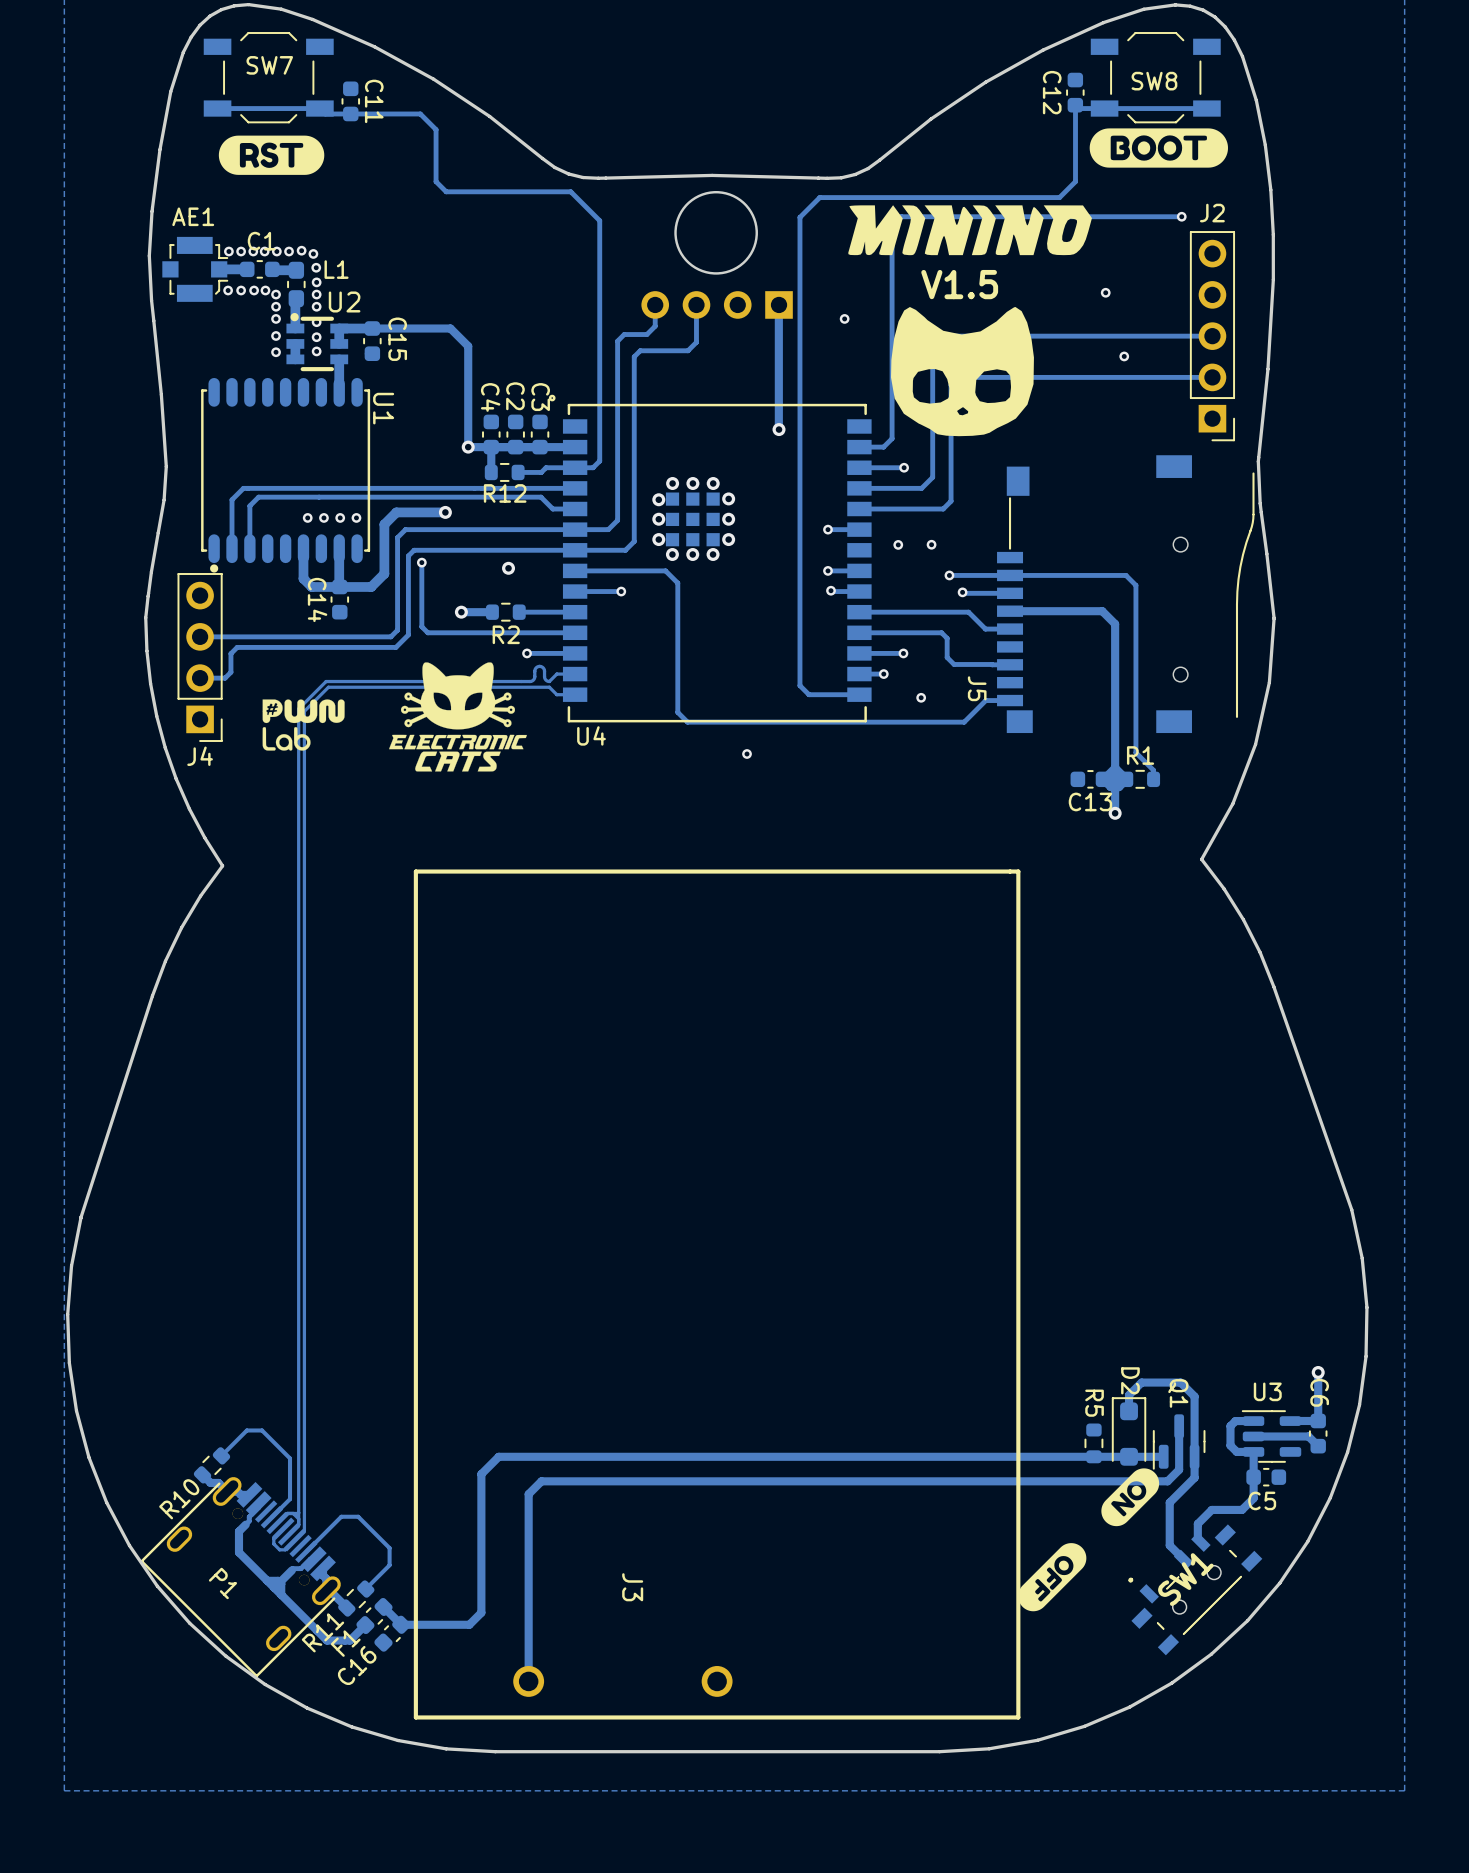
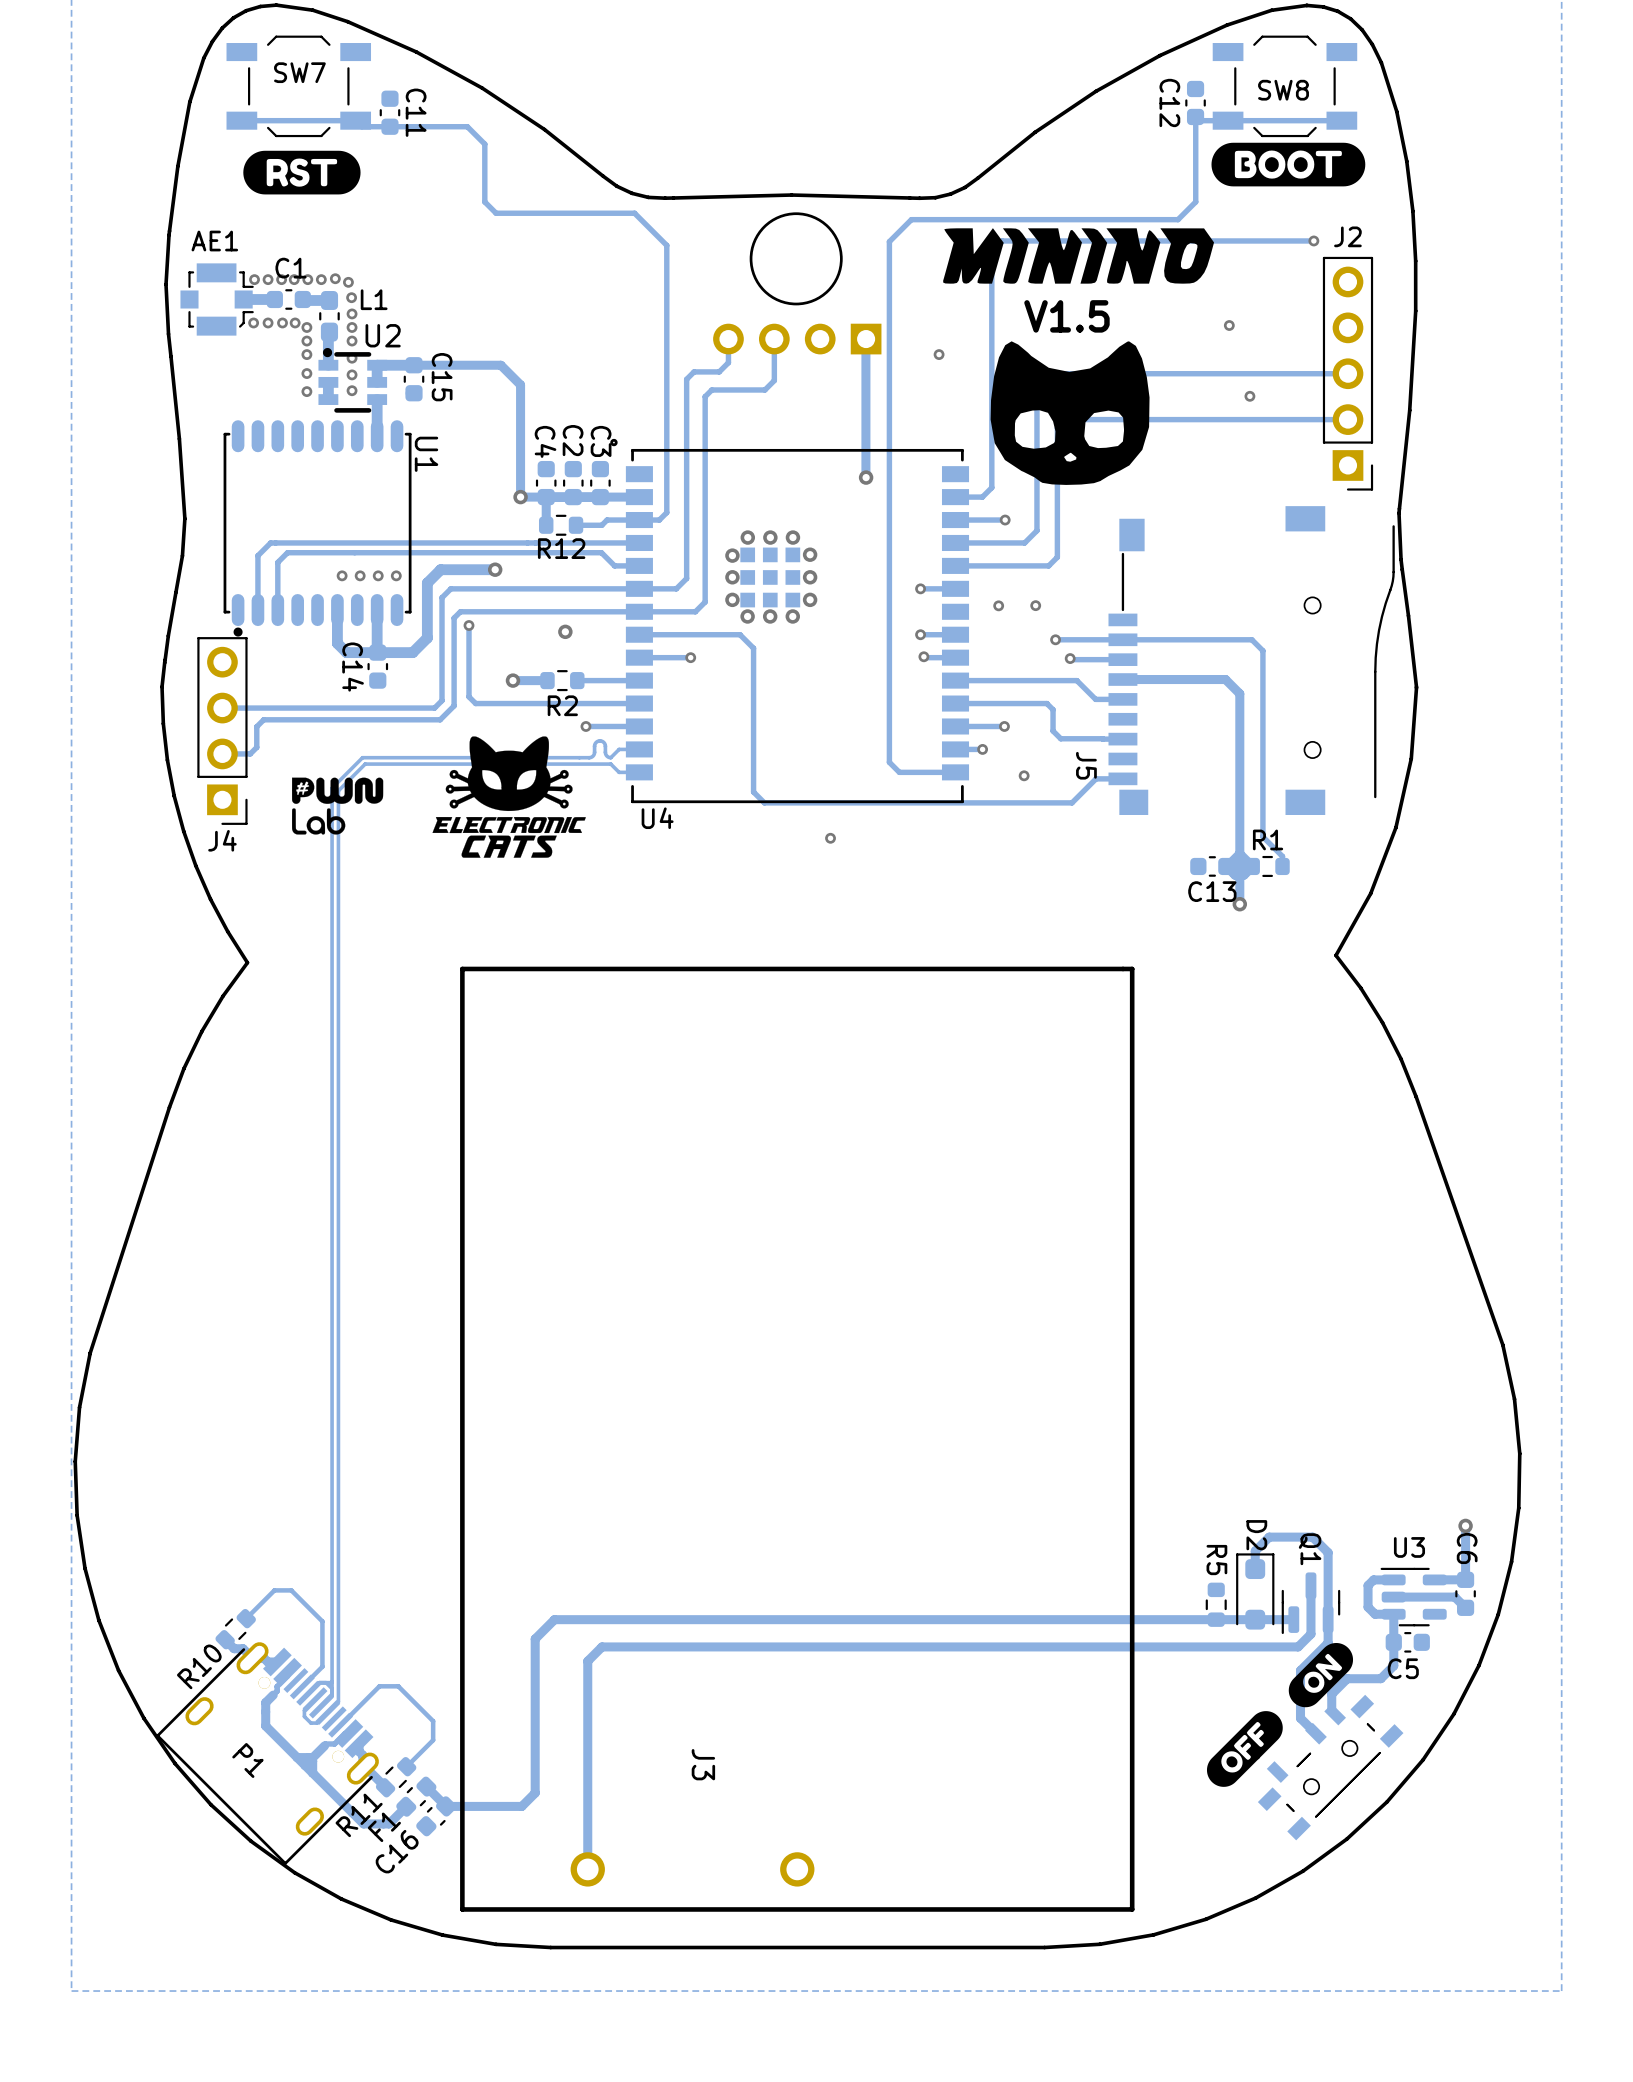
drawing: [1101, 1468, 1160, 1527] -> none
drawing: none -> [1206, 1642, 1354, 1787]
drawing: [1018, 1543, 1087, 1612] -> none
SW1 name: SW1 (1185, 1579) -> none

